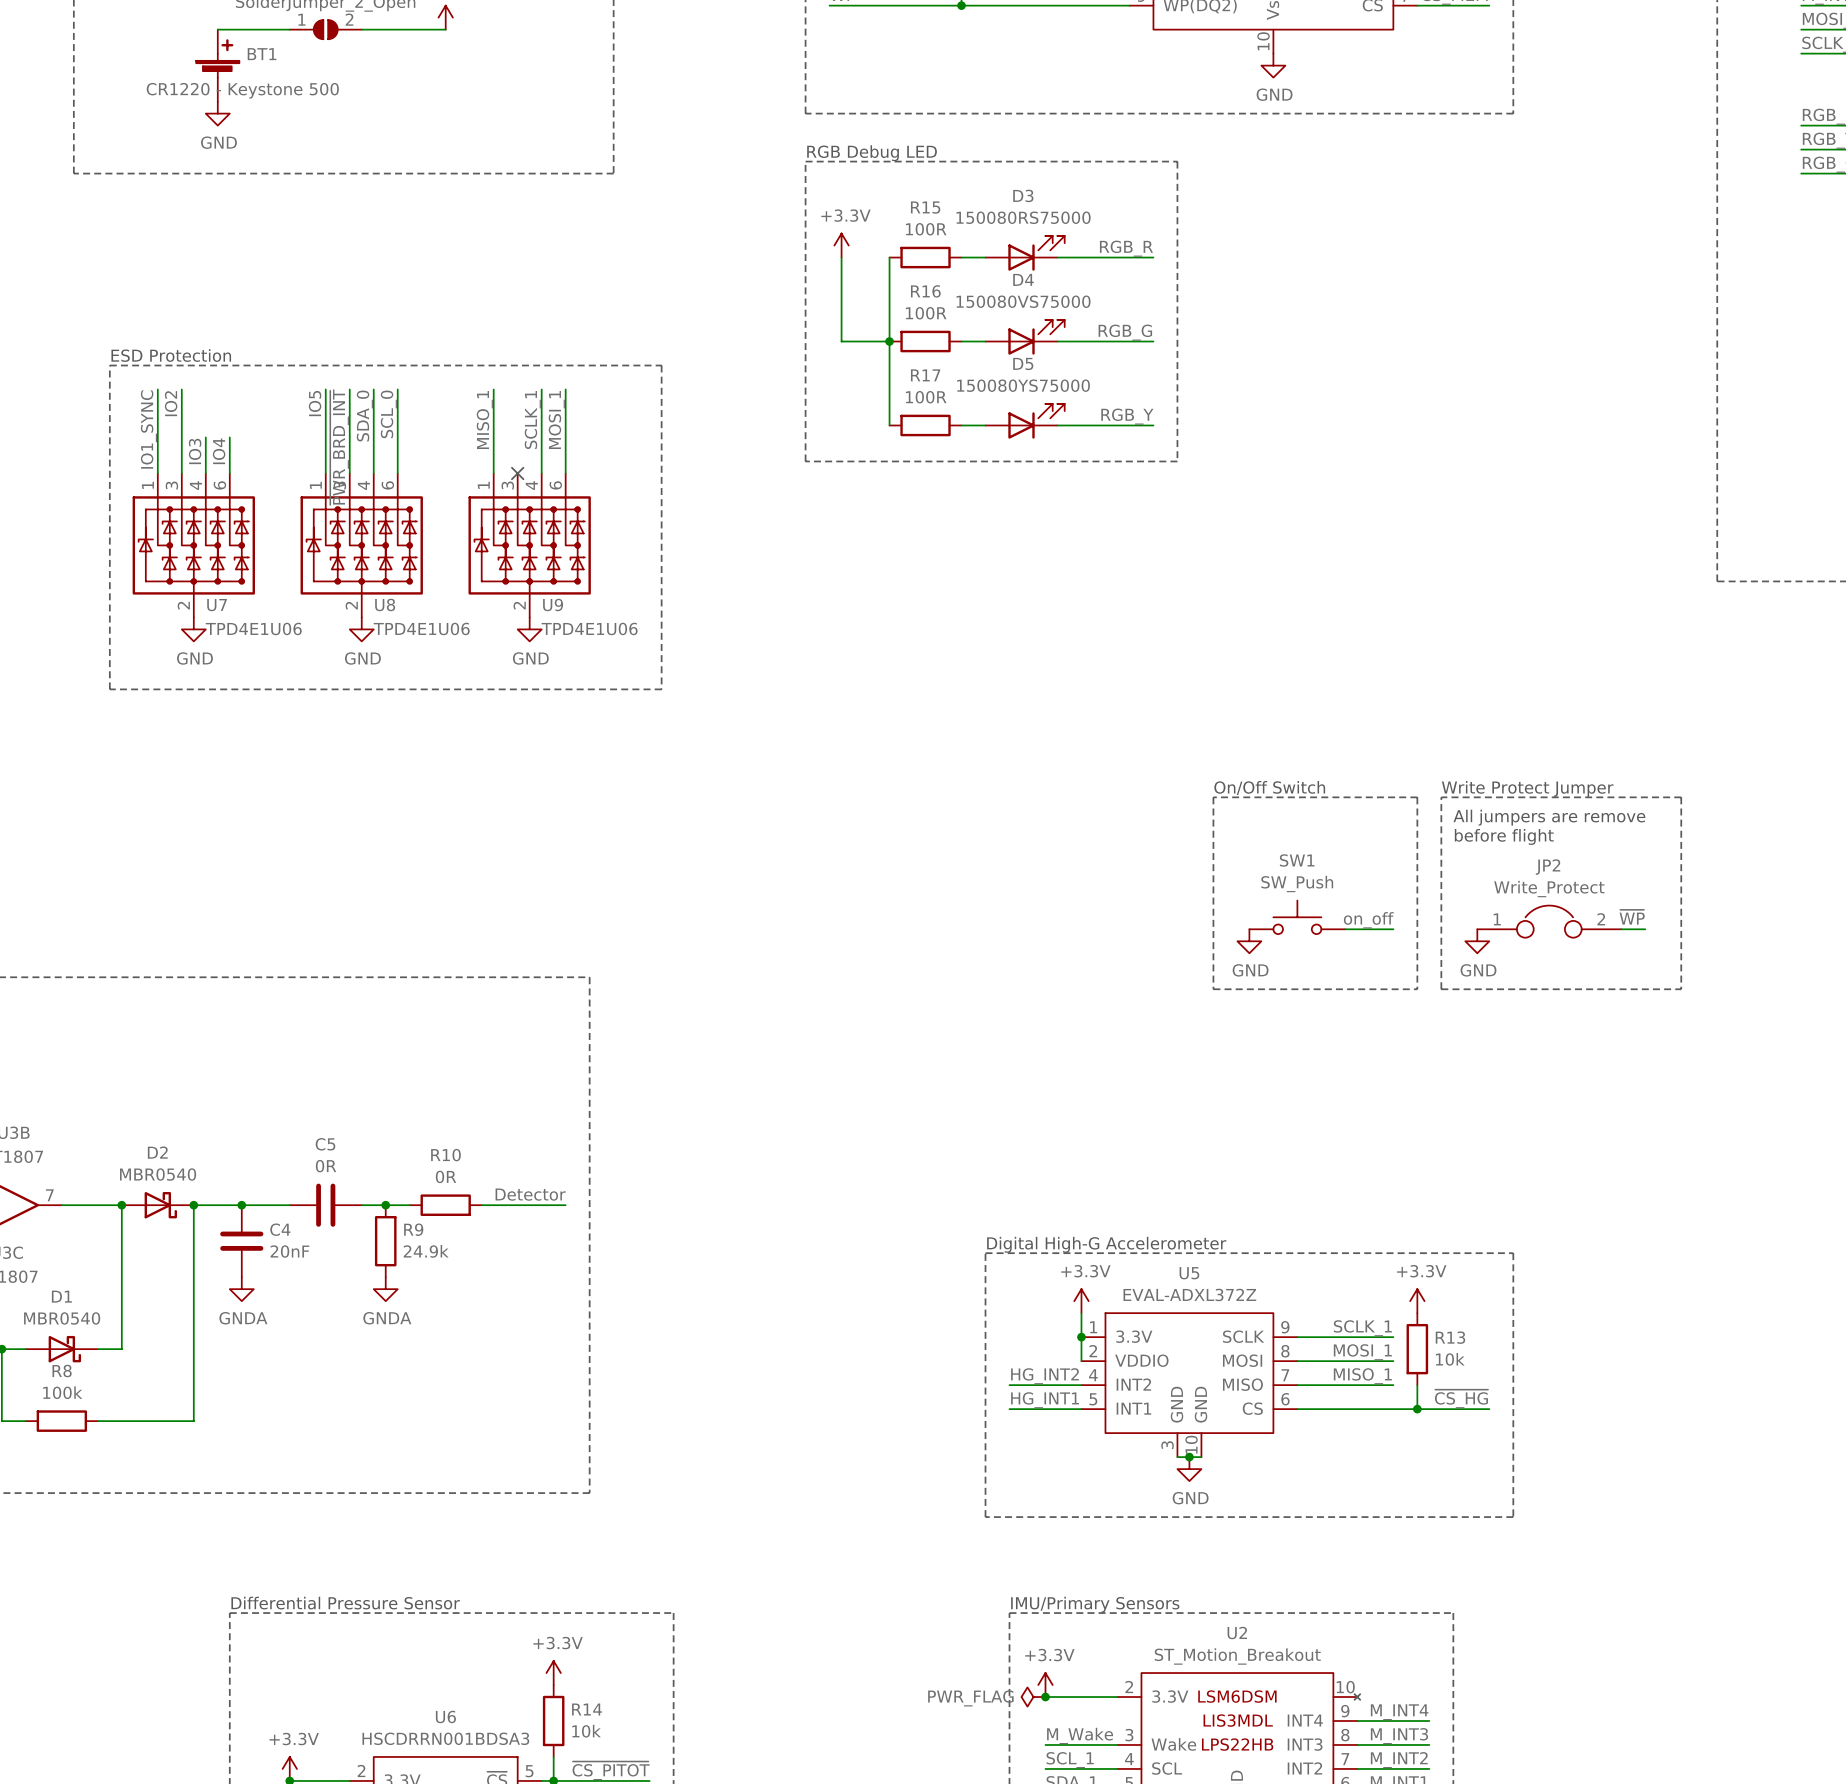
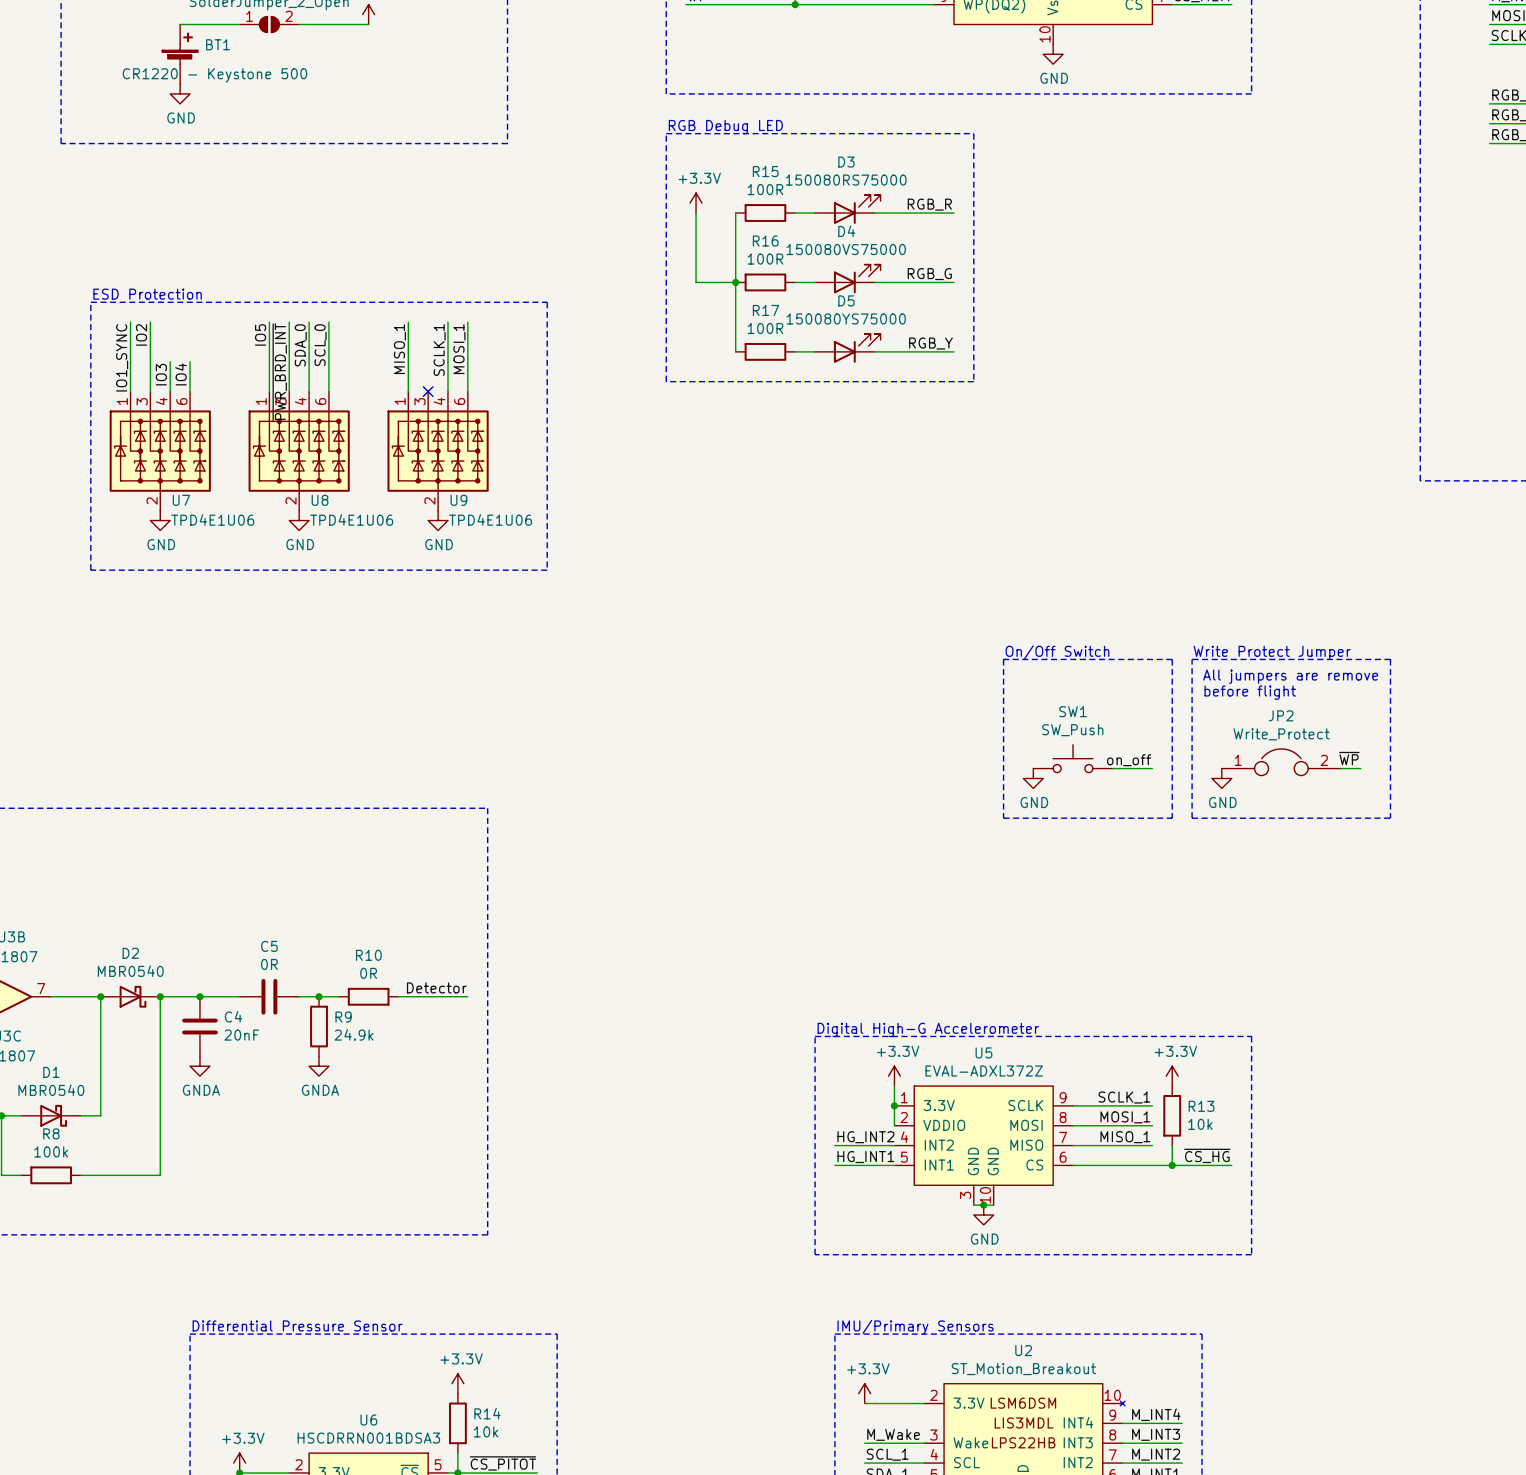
power symbol: PWR_FLAG (1033, 1697) -> none
junction: (1045, 1697) -> none

